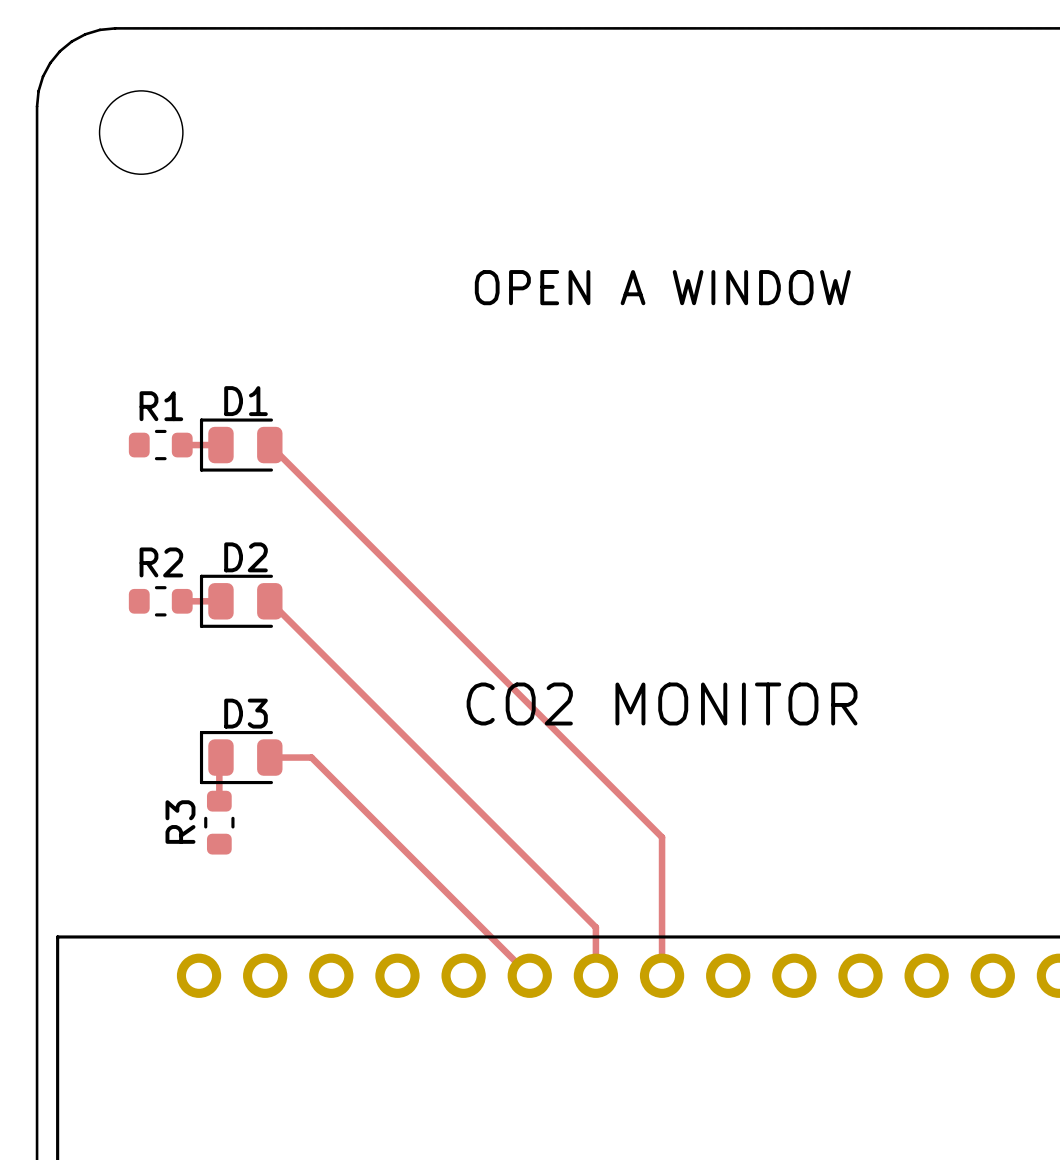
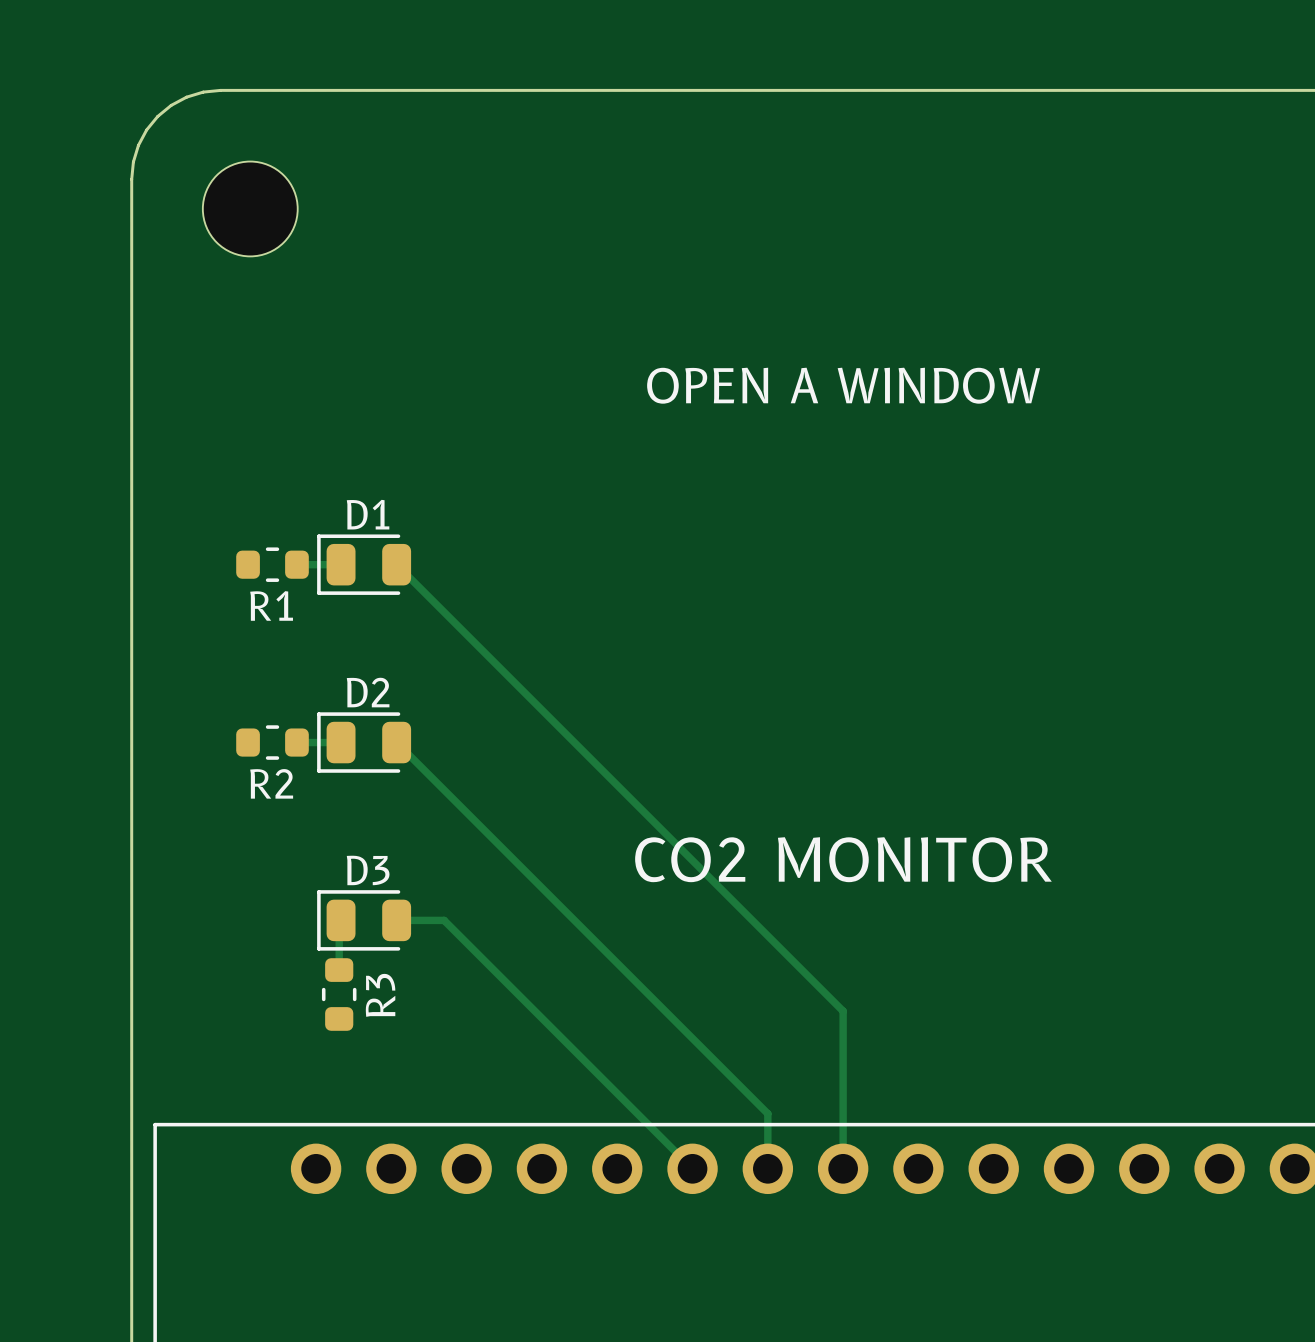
R1 name position: R1 (161, 406) -> R1 (271, 605)
R2 name position: R2 (161, 562) -> R2 (271, 783)
R3 name position: R3 (180, 822) -> R3 (380, 995)

